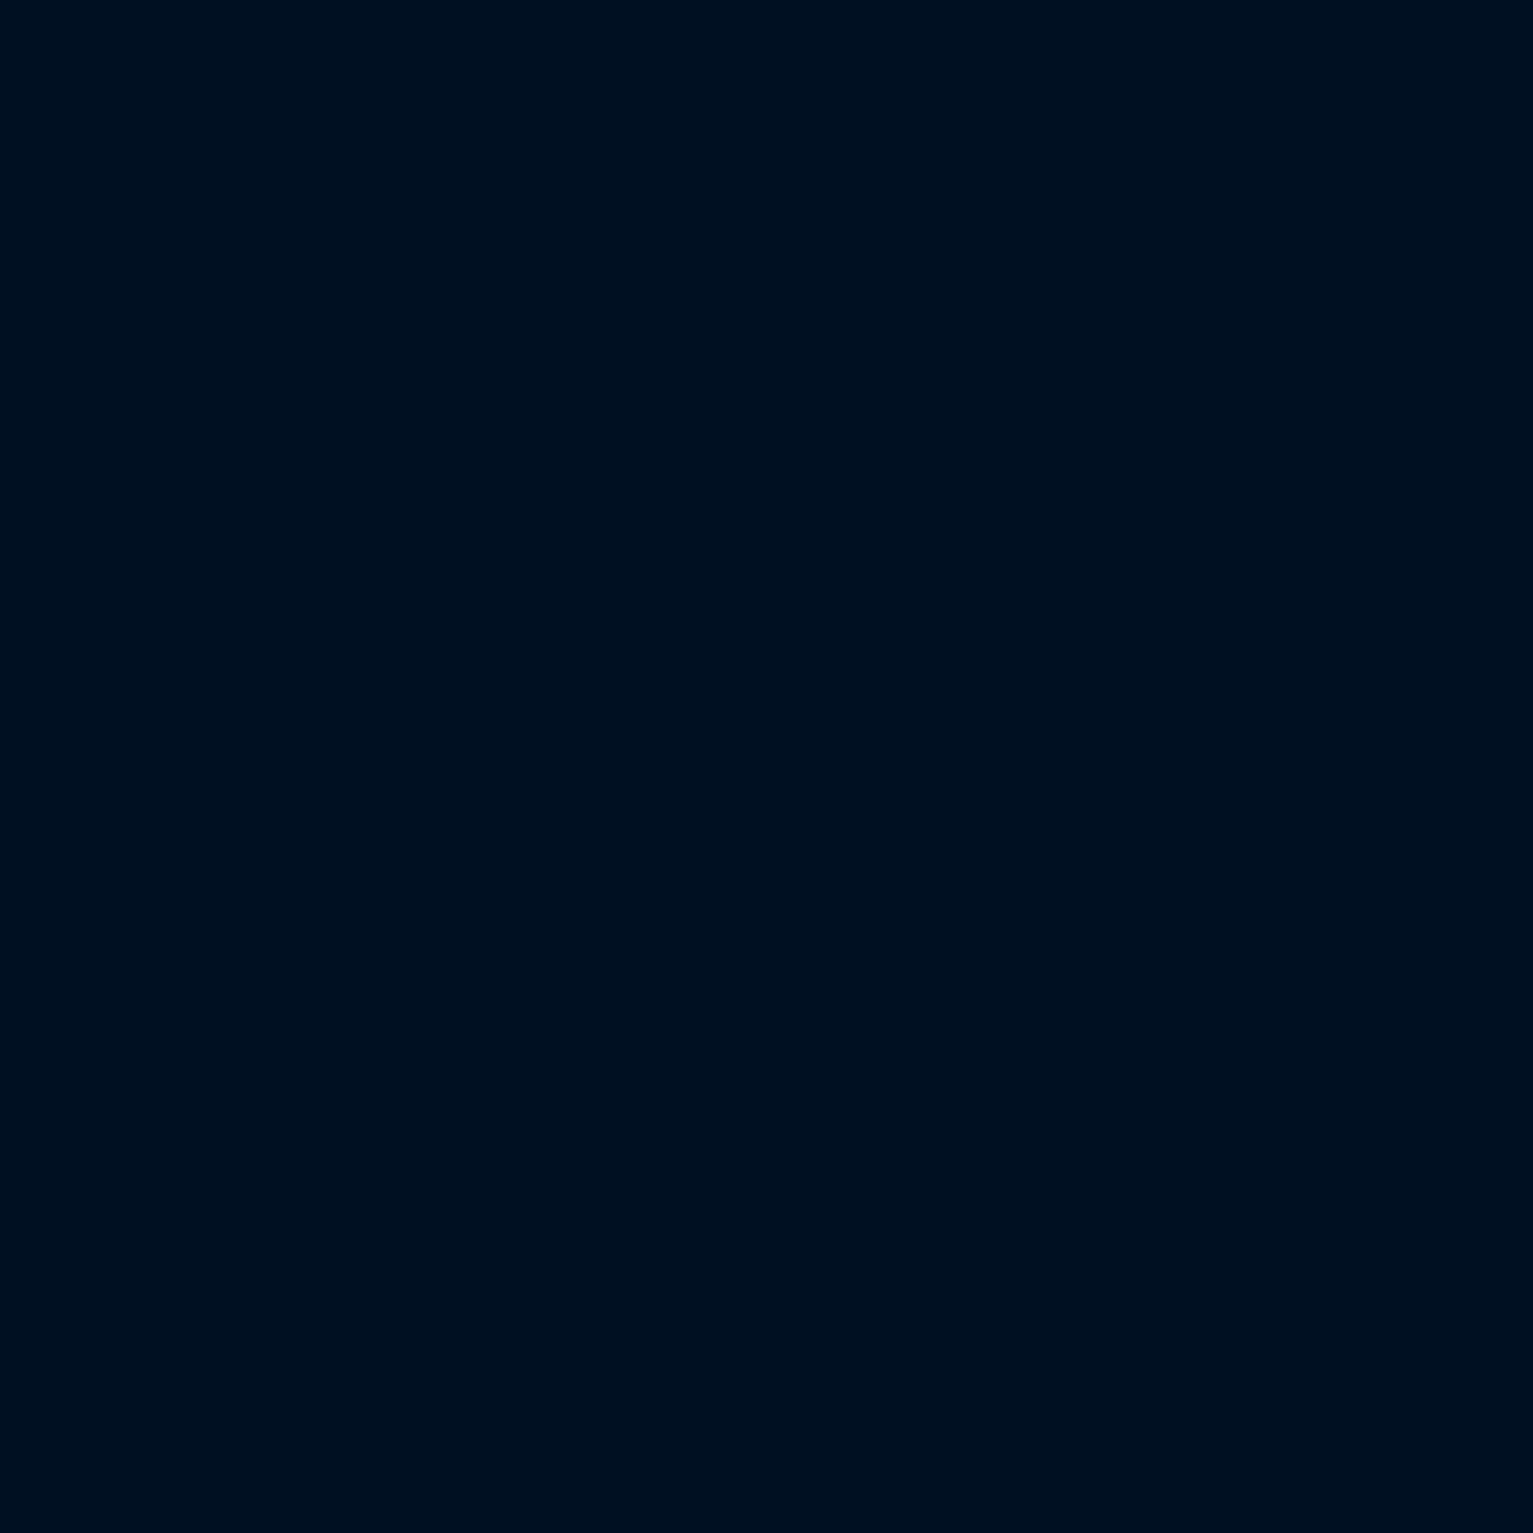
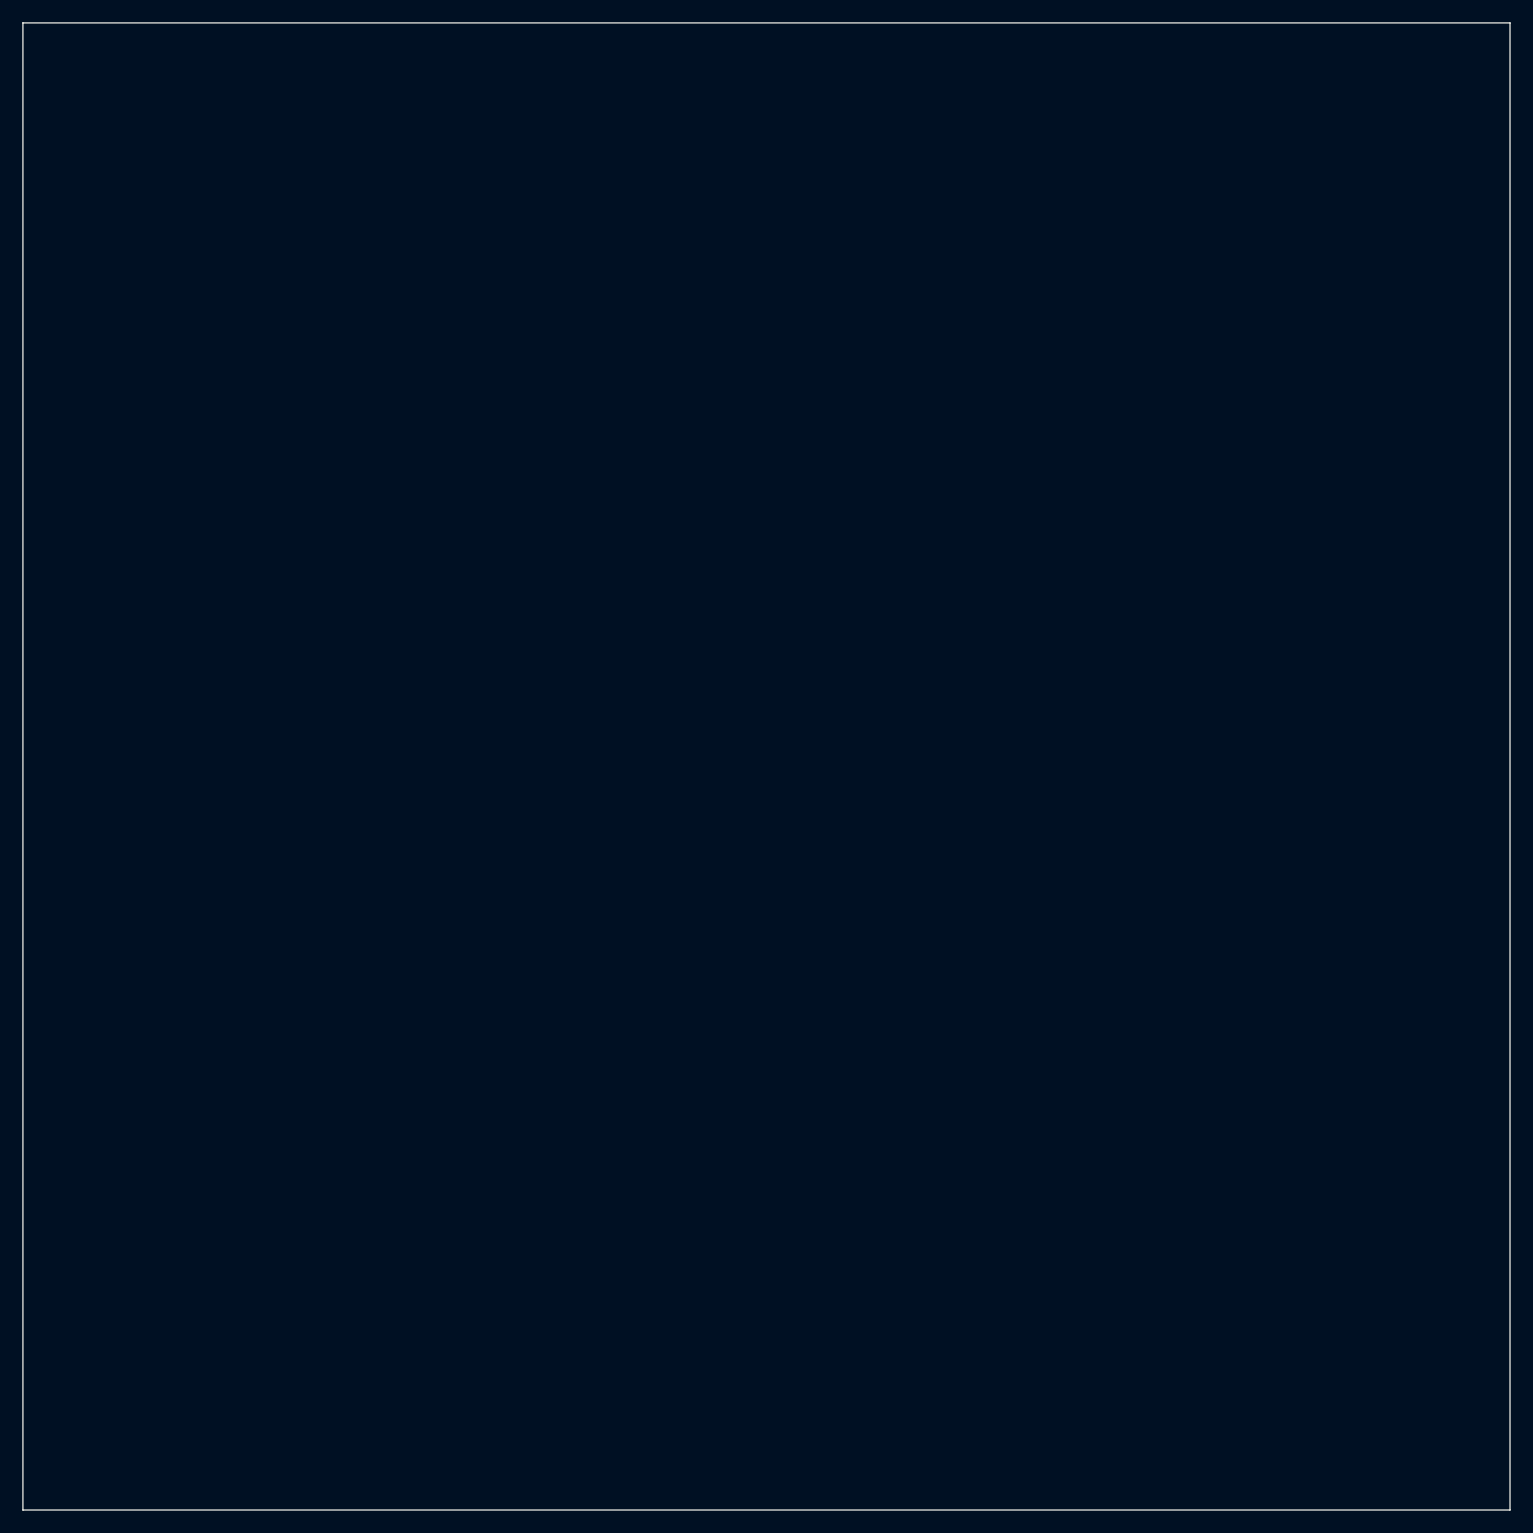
board edge: none -> (1510, 22) (22, 22) (22, 1510) (1510, 1510) (1510, 22)

